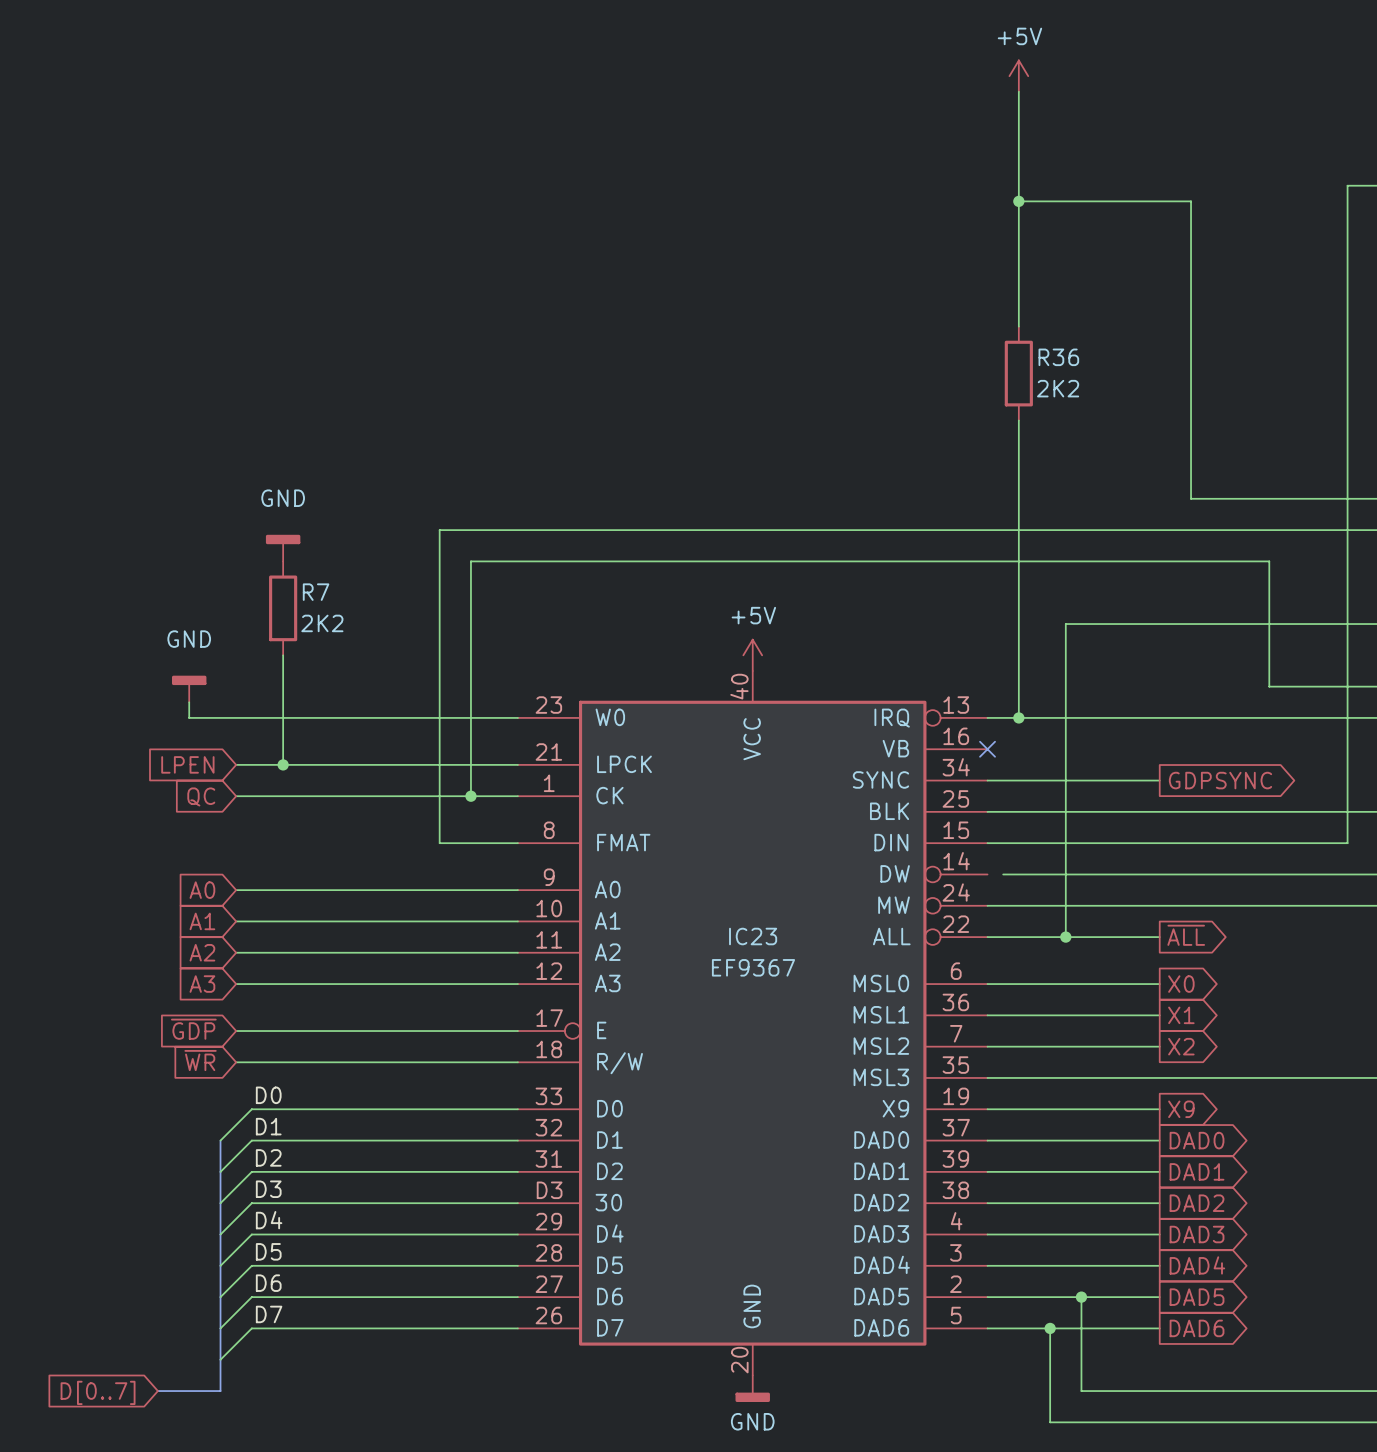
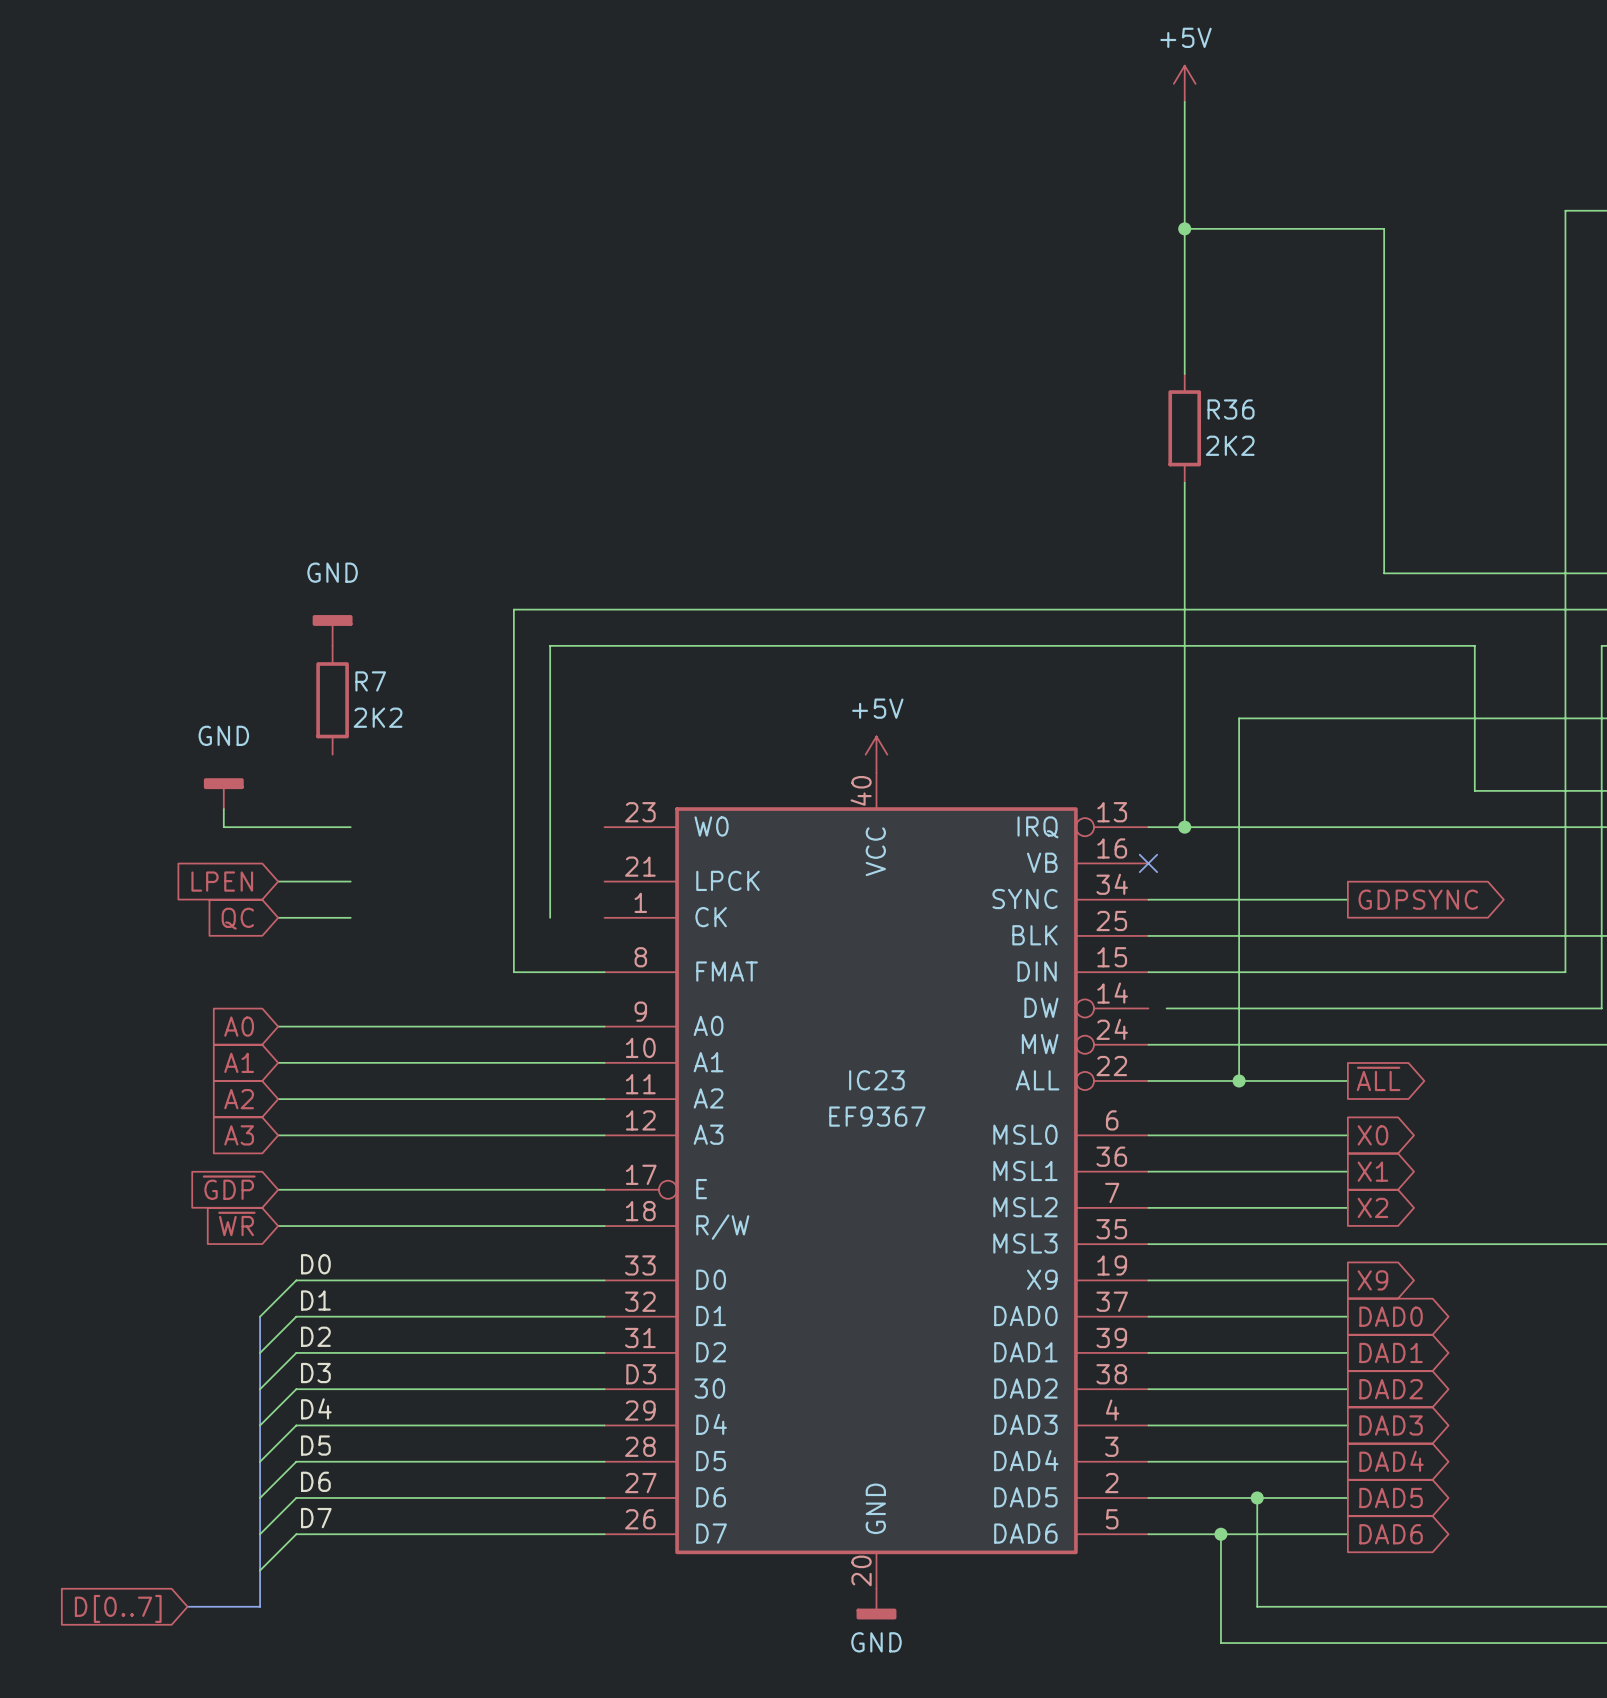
wire: (283, 655) (283, 764) -> none
wire: (298, 717) (517, 717) -> none
junction: (283, 764) -> none
wire: (298, 764) (517, 764) -> none
wire: (298, 796) (517, 796) -> none
junction: (470, 796) -> none

